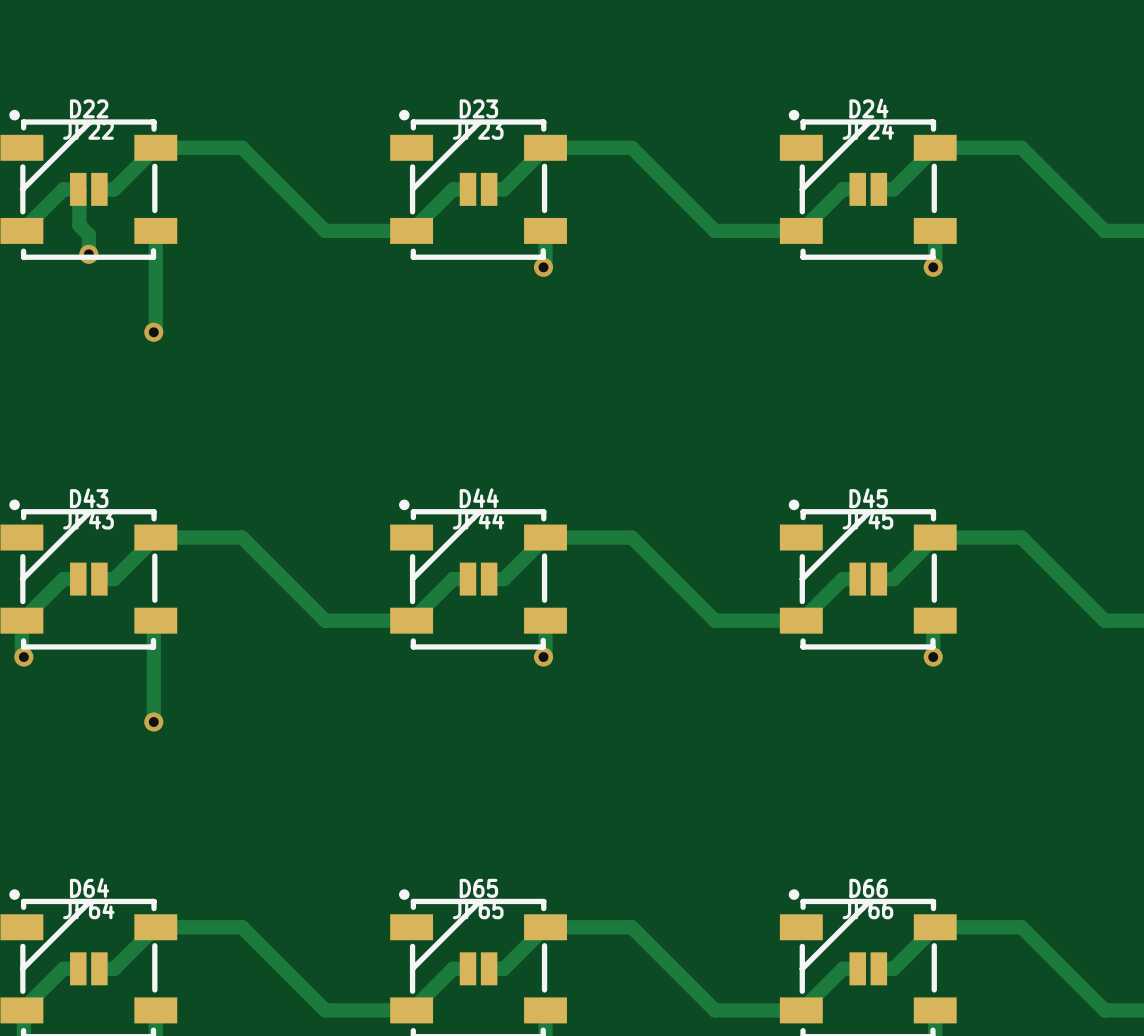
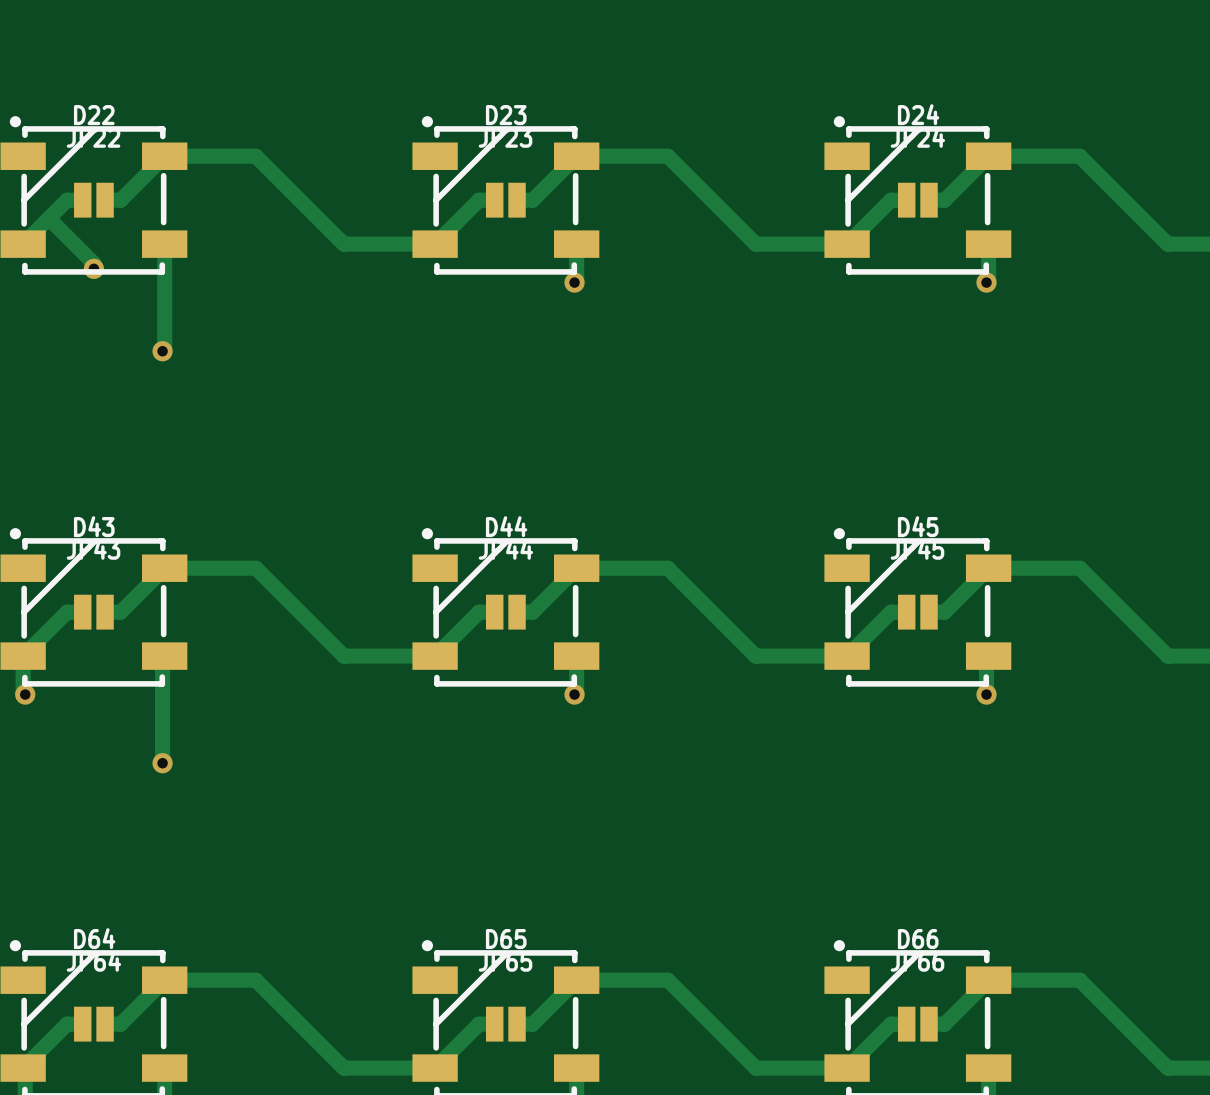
track: (78, 189) (79, 225) (88, 234) (88, 249) -> (48, 218) (93, 263)

